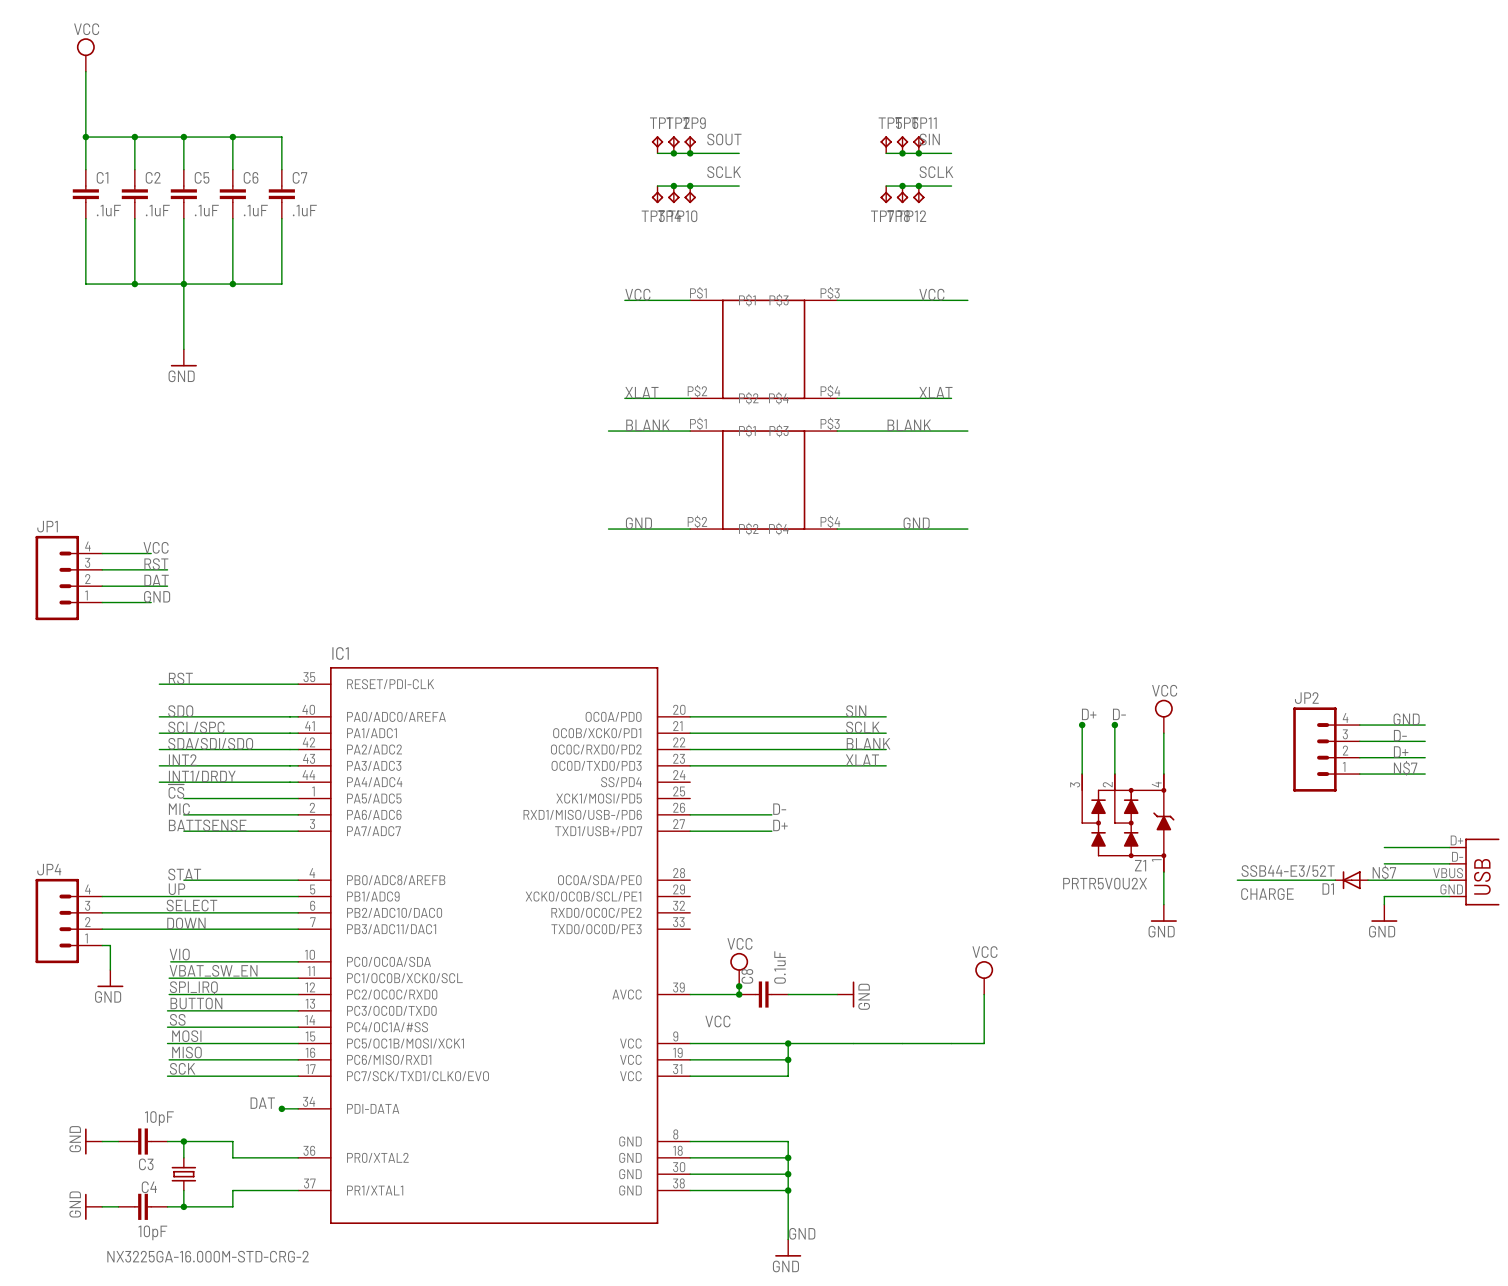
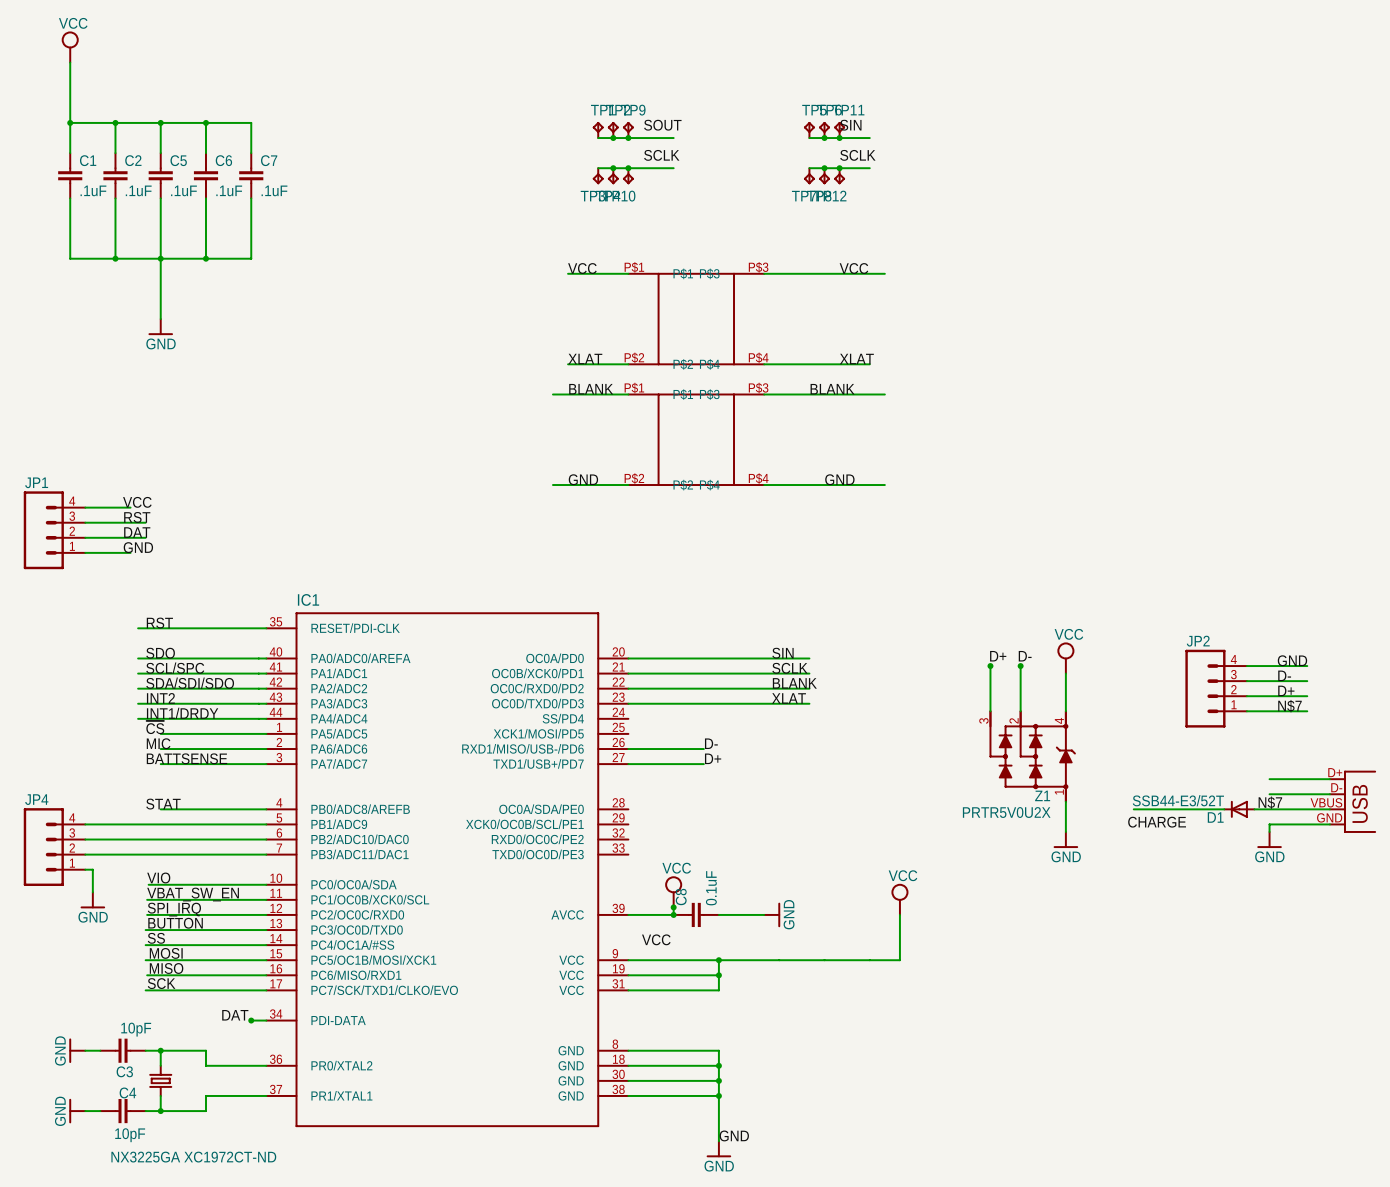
label: UP (177, 889) -> none
label: SELECT (191, 905) -> none
label: DOWN (186, 923) -> none
part value: NX3225GA-16.000M-STD-CRG-2 (208, 1256) -> NX3225GA XC1972CT-ND (193, 1157)

